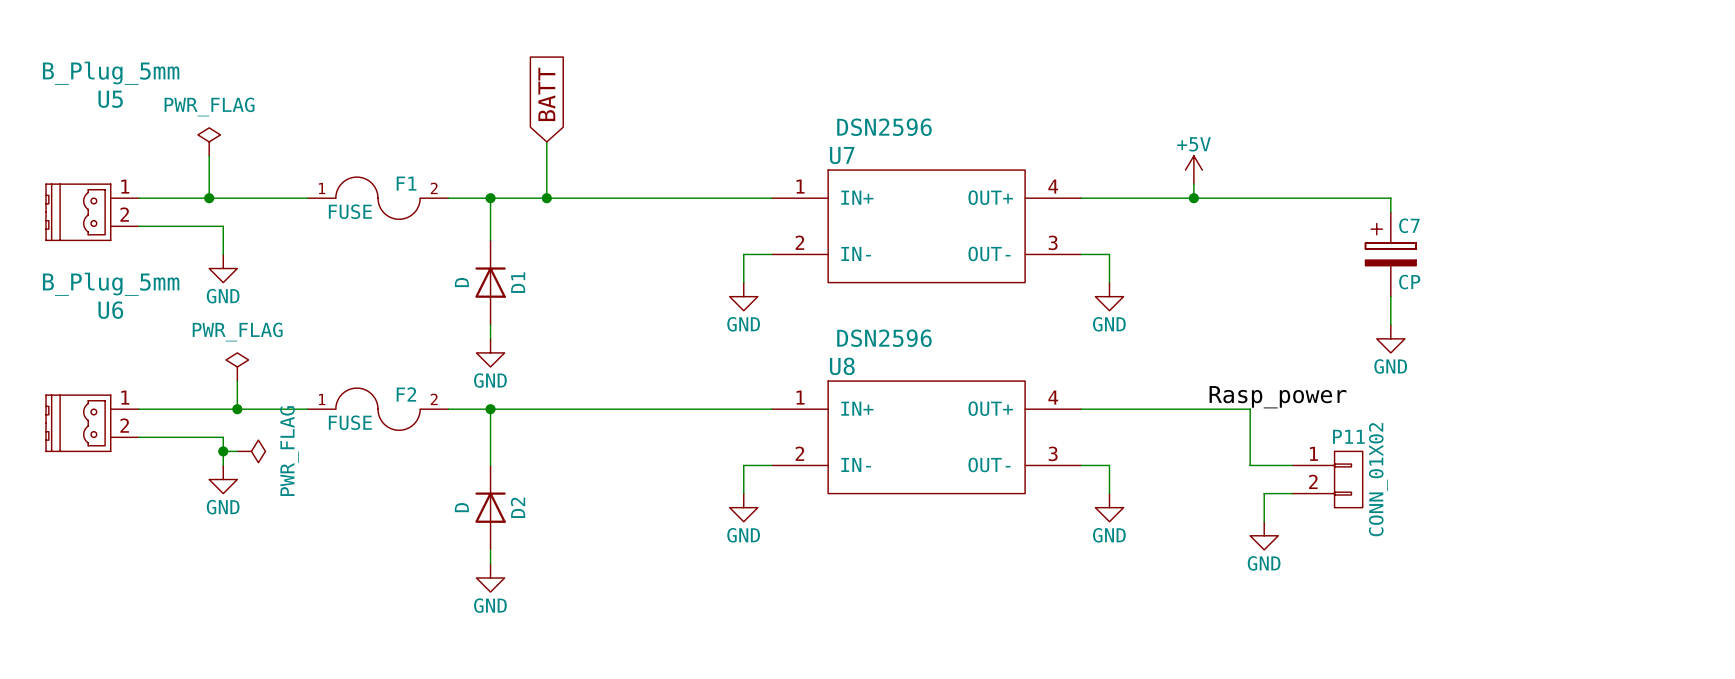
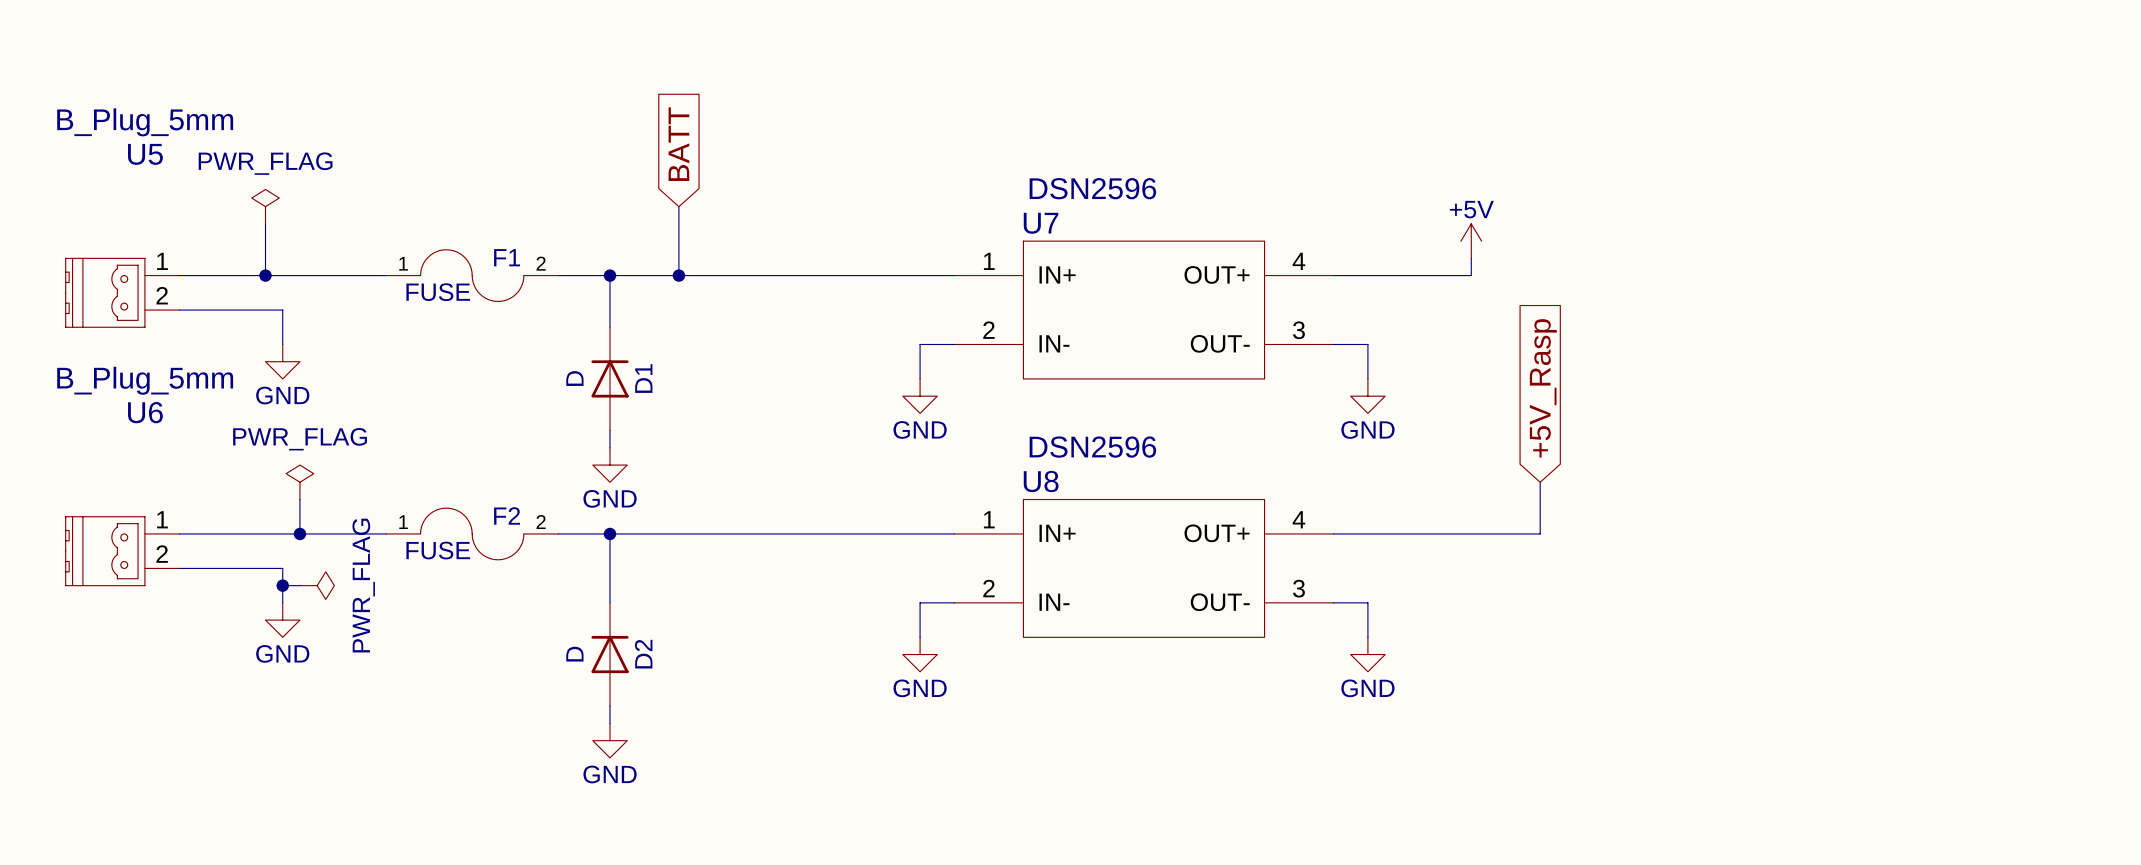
wire: (1193, 198) (1390, 198) (1390, 212) -> none
junction: (1193, 198) -> none
C7: CP (1390, 254) -> none
global label: none -> +5V_Rasp (1543, 388)
wire: (1390, 296) (1390, 324) -> none
power symbol: GND (1390, 338) -> none
label: Rasp_power (1278, 397) -> none
wire: (1250, 409) (1250, 465) (1292, 465) -> (1540, 533) (1540, 482)
P11: CONN_01X02 (1327, 479) -> none
wire: (1292, 493) (1264, 493) (1264, 521) -> none
power symbol: GND (1264, 535) -> none

